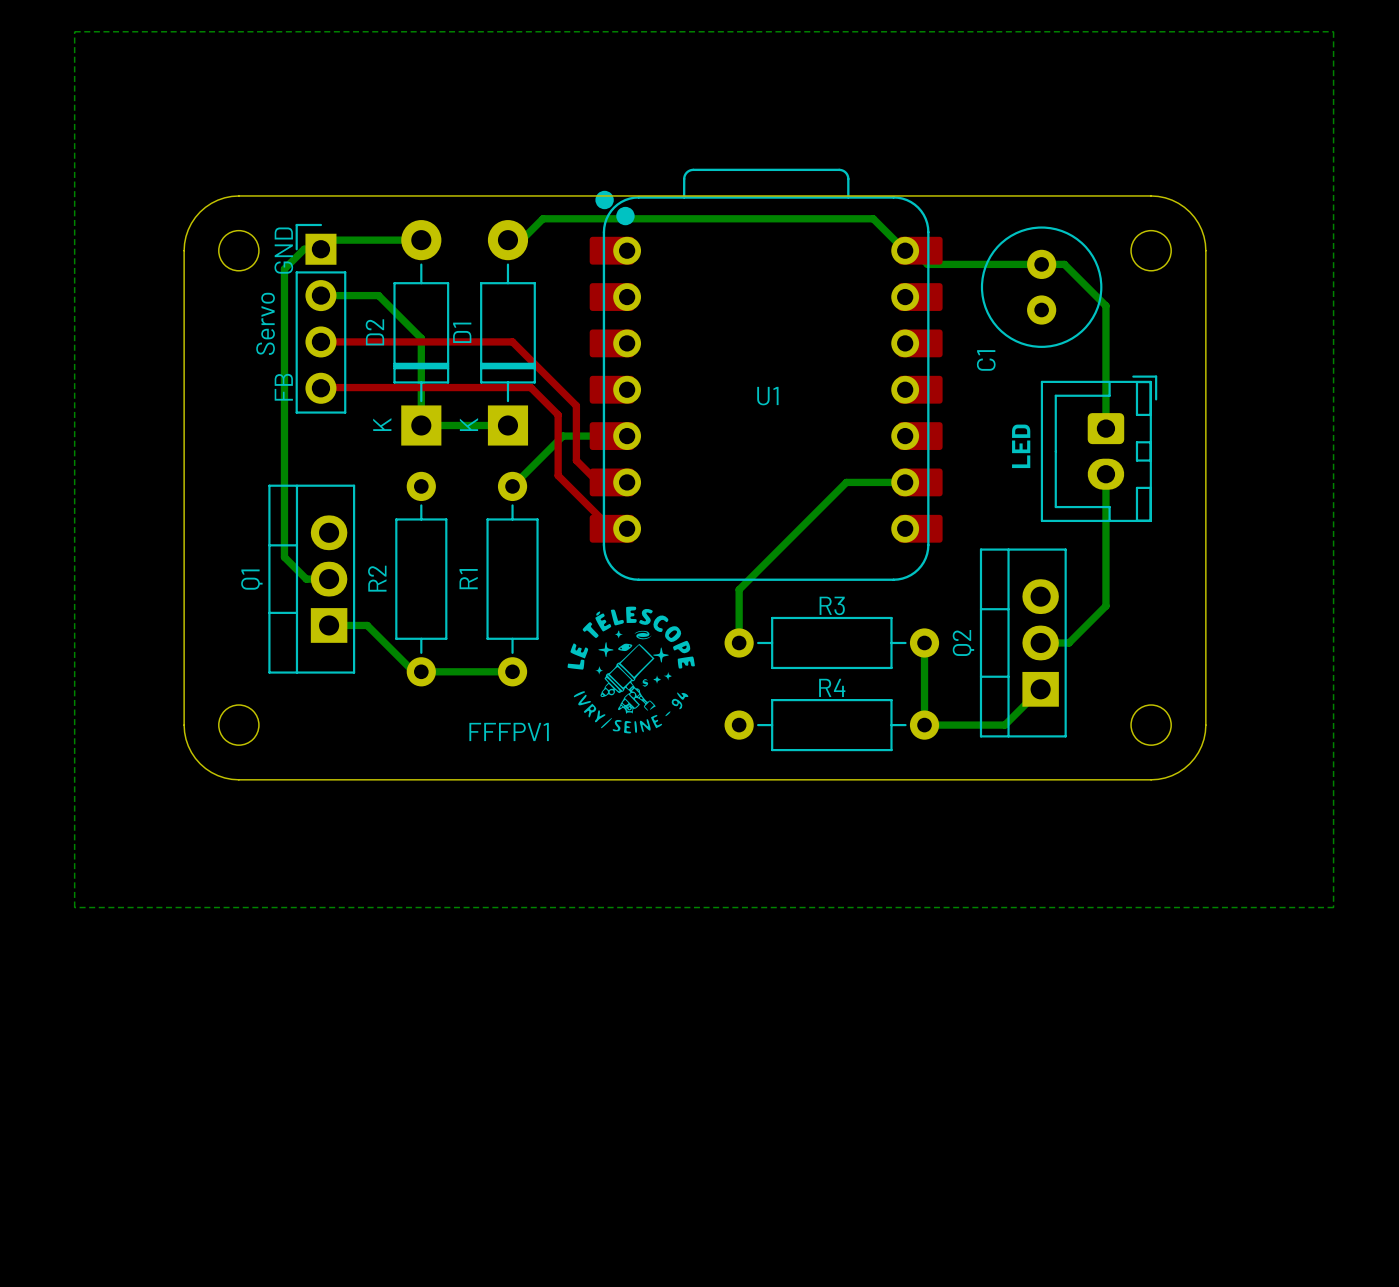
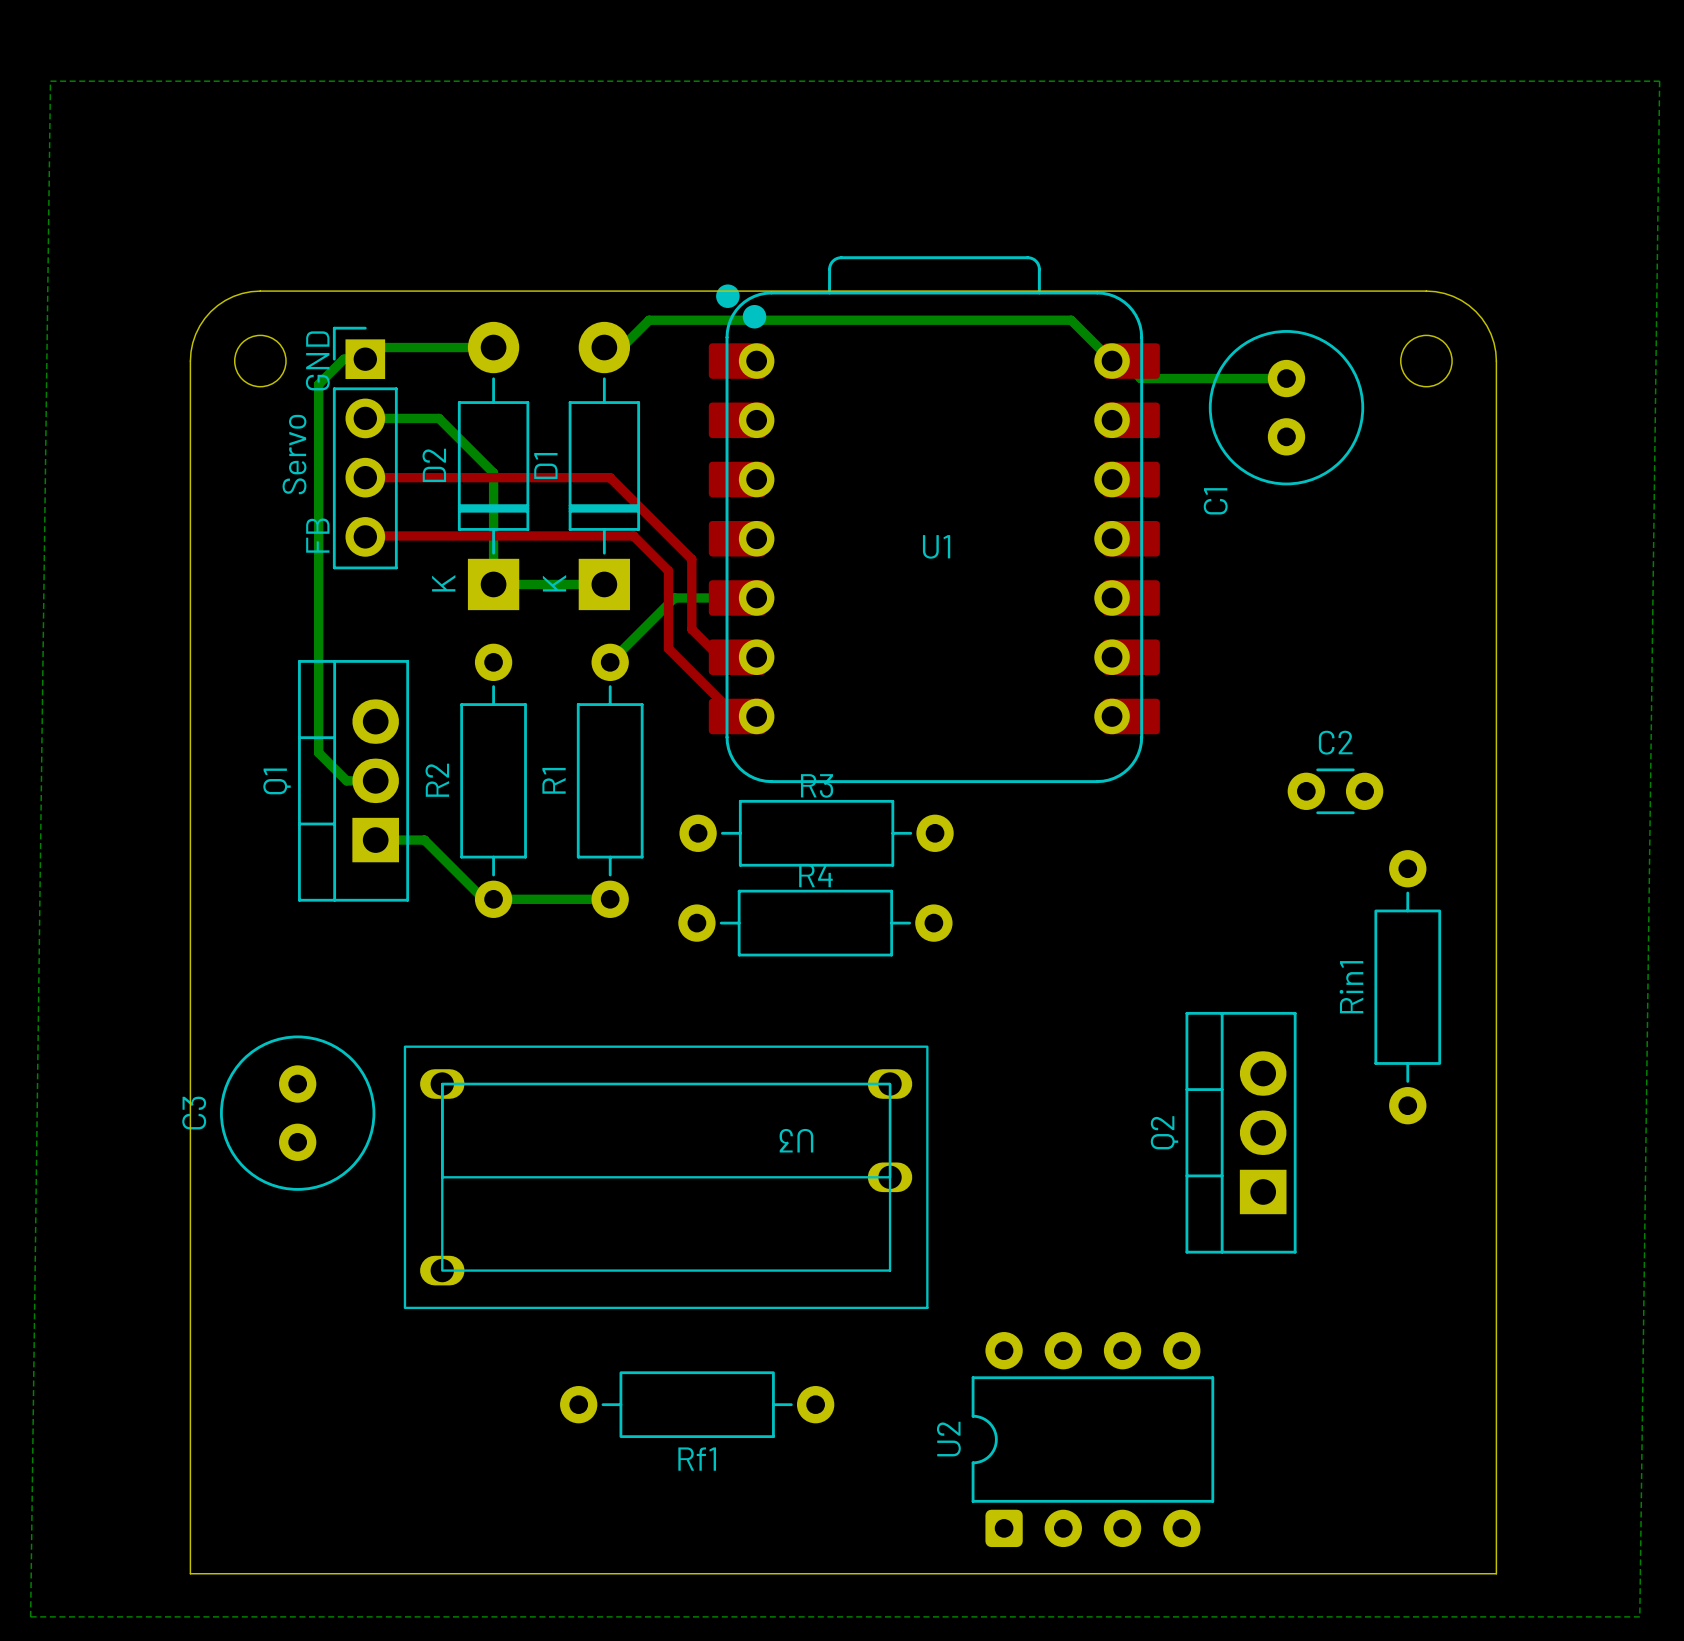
bottom zone outline: (74, 31) (74, 907) (1333, 907) (1333, 31) -> (50, 81) (30, 1616) (1639, 1616) (1659, 81)
bottom track: (1041, 264) (1064, 264) (1105, 305) (1105, 428) -> none
text: LED (1021, 446) -> none
part: (1099, 448) -> none
bottom track: (1105, 474) (1105, 606) (1069, 642) (1040, 642) -> none
bottom track: (905, 482) (846, 482) (739, 589) (739, 642) -> none
C2: none -> (1335, 791)
drawing: [567, 606, 695, 734] -> none
R3 position: (831, 642) -> (816, 833)
bottom track: (924, 642) (924, 725) (1004, 725) (1040, 689) -> none
Q2 position: (1023, 642) -> (1241, 1132)
round board edge: [218, 704, 260, 746] -> none
round board edge: [1130, 704, 1172, 746] -> none
board edge: (184, 725) (188, 746) (200, 763) (217, 775) (238, 779) (1151, 779) (1172, 775) (1189, 763) (1201, 746) (1205, 725) -> (190, 967) (190, 1573) (1496, 1573) (1496, 967)
R4 position: (831, 725) -> (815, 923)
text: FFFPV1 (509, 731) -> none
Rin1: none -> (1407, 987)
C3: none -> (297, 1113)
U3: none -> (666, 1177)
Rf1: none -> (697, 1404)
U2: none -> (1092, 1439)

